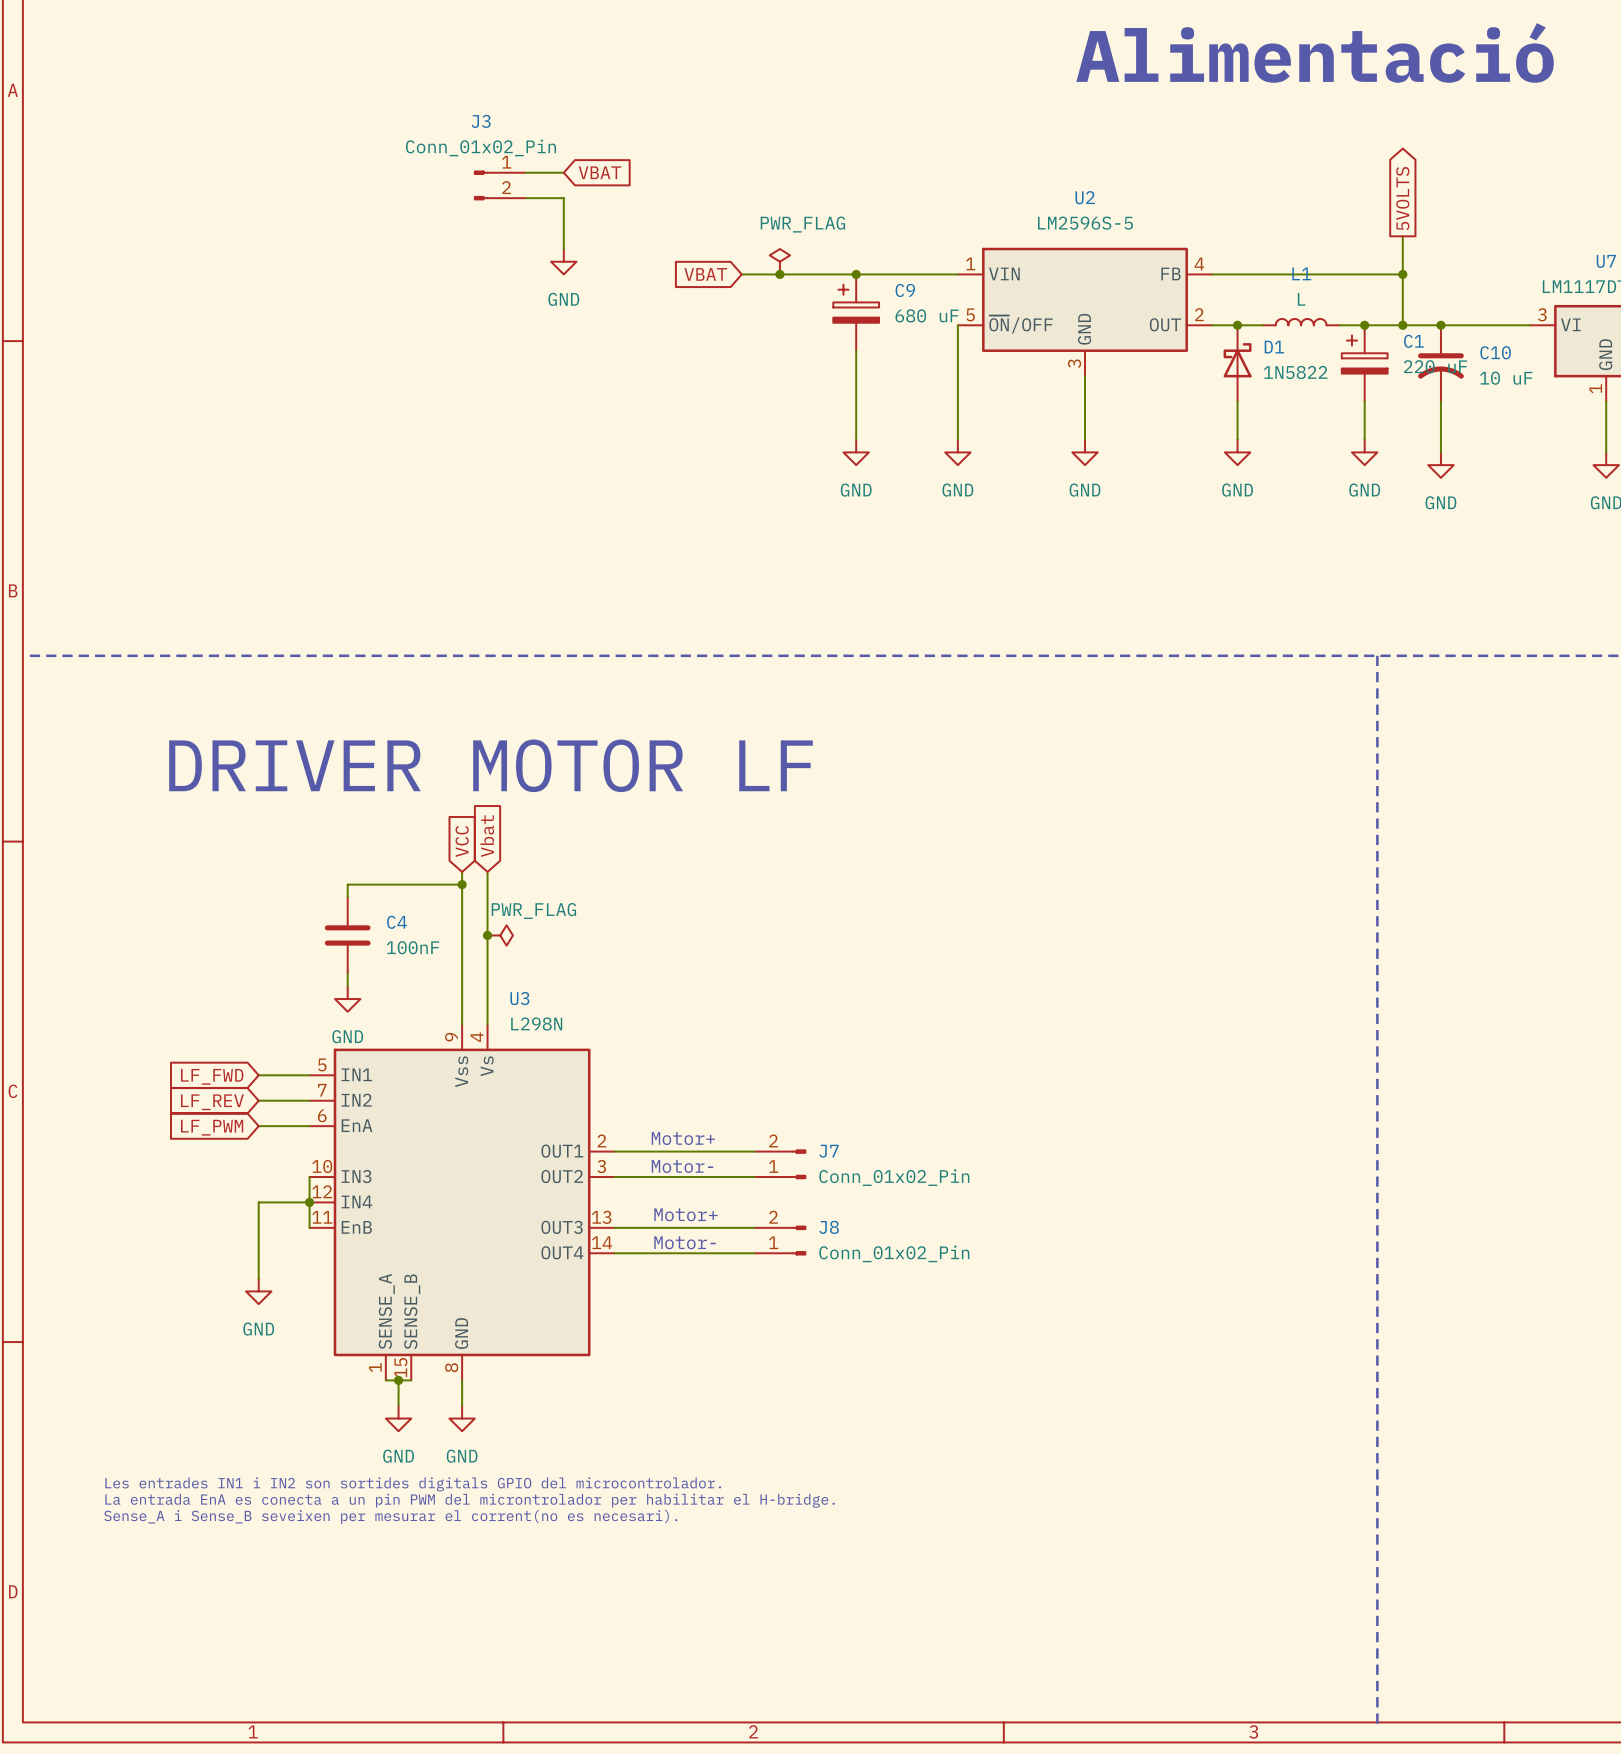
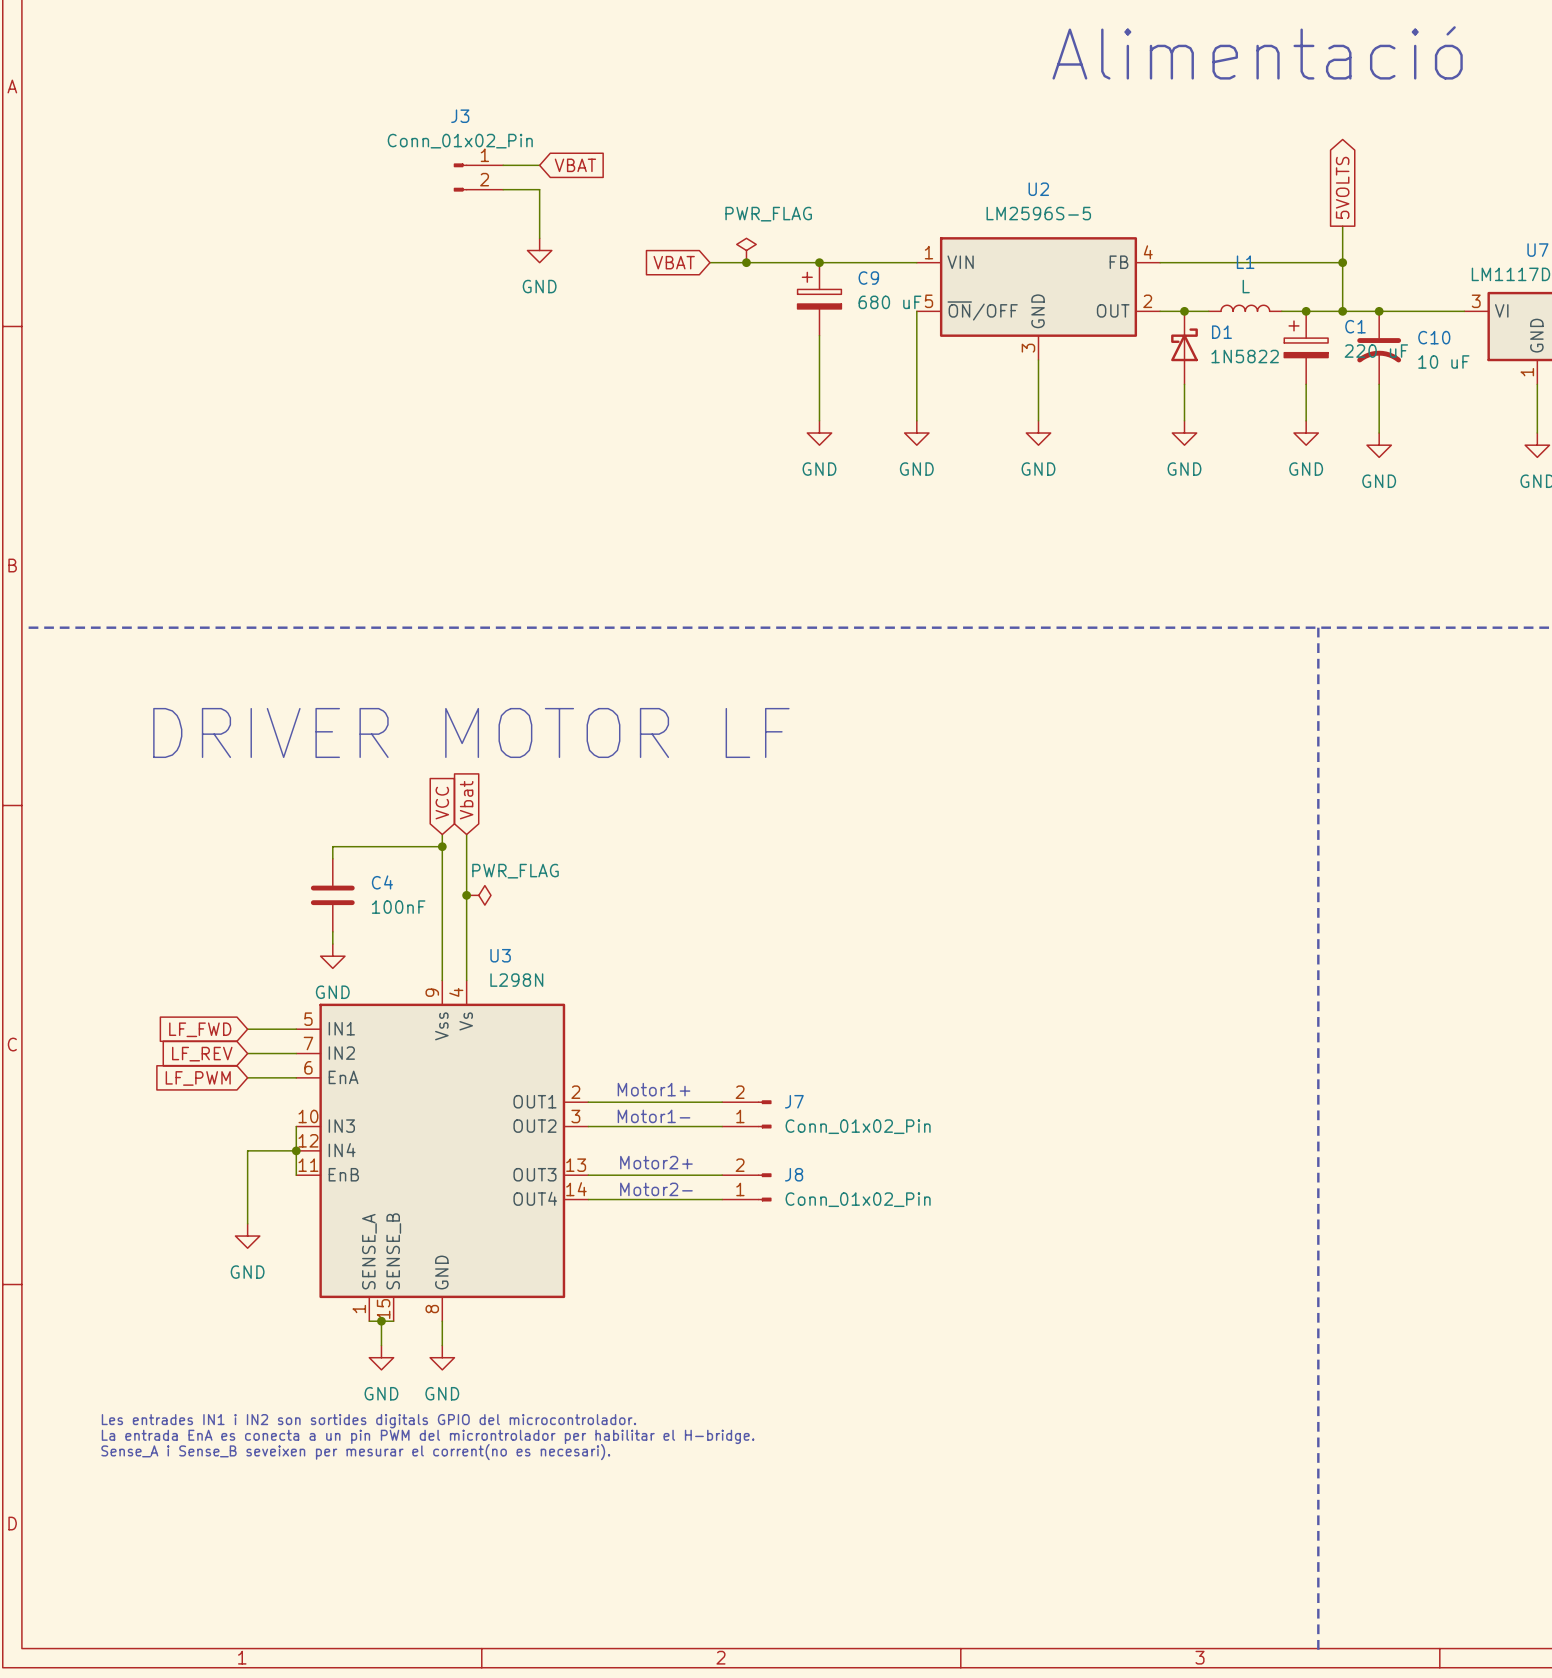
text: Motor+ (683, 1138) -> Motor1+ (654, 1089)
text: Motor- (682, 1166) -> Motor1- (654, 1116)
text: Motor+ (685, 1214) -> Motor2+ (656, 1162)
text: Motor- (685, 1242) -> Motor2- (656, 1189)

